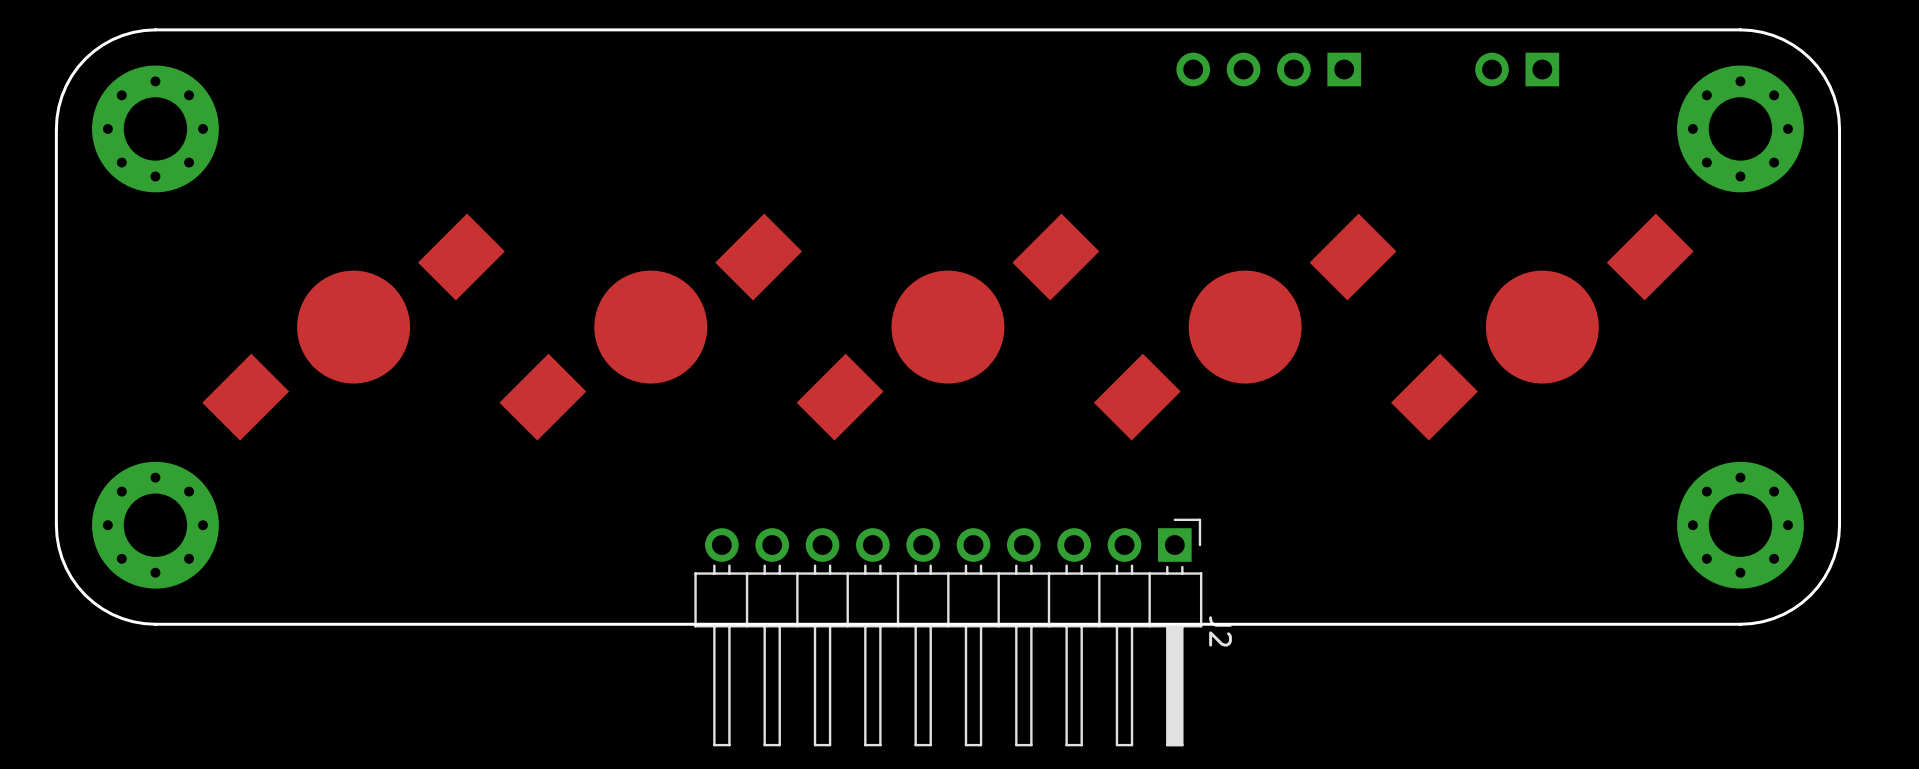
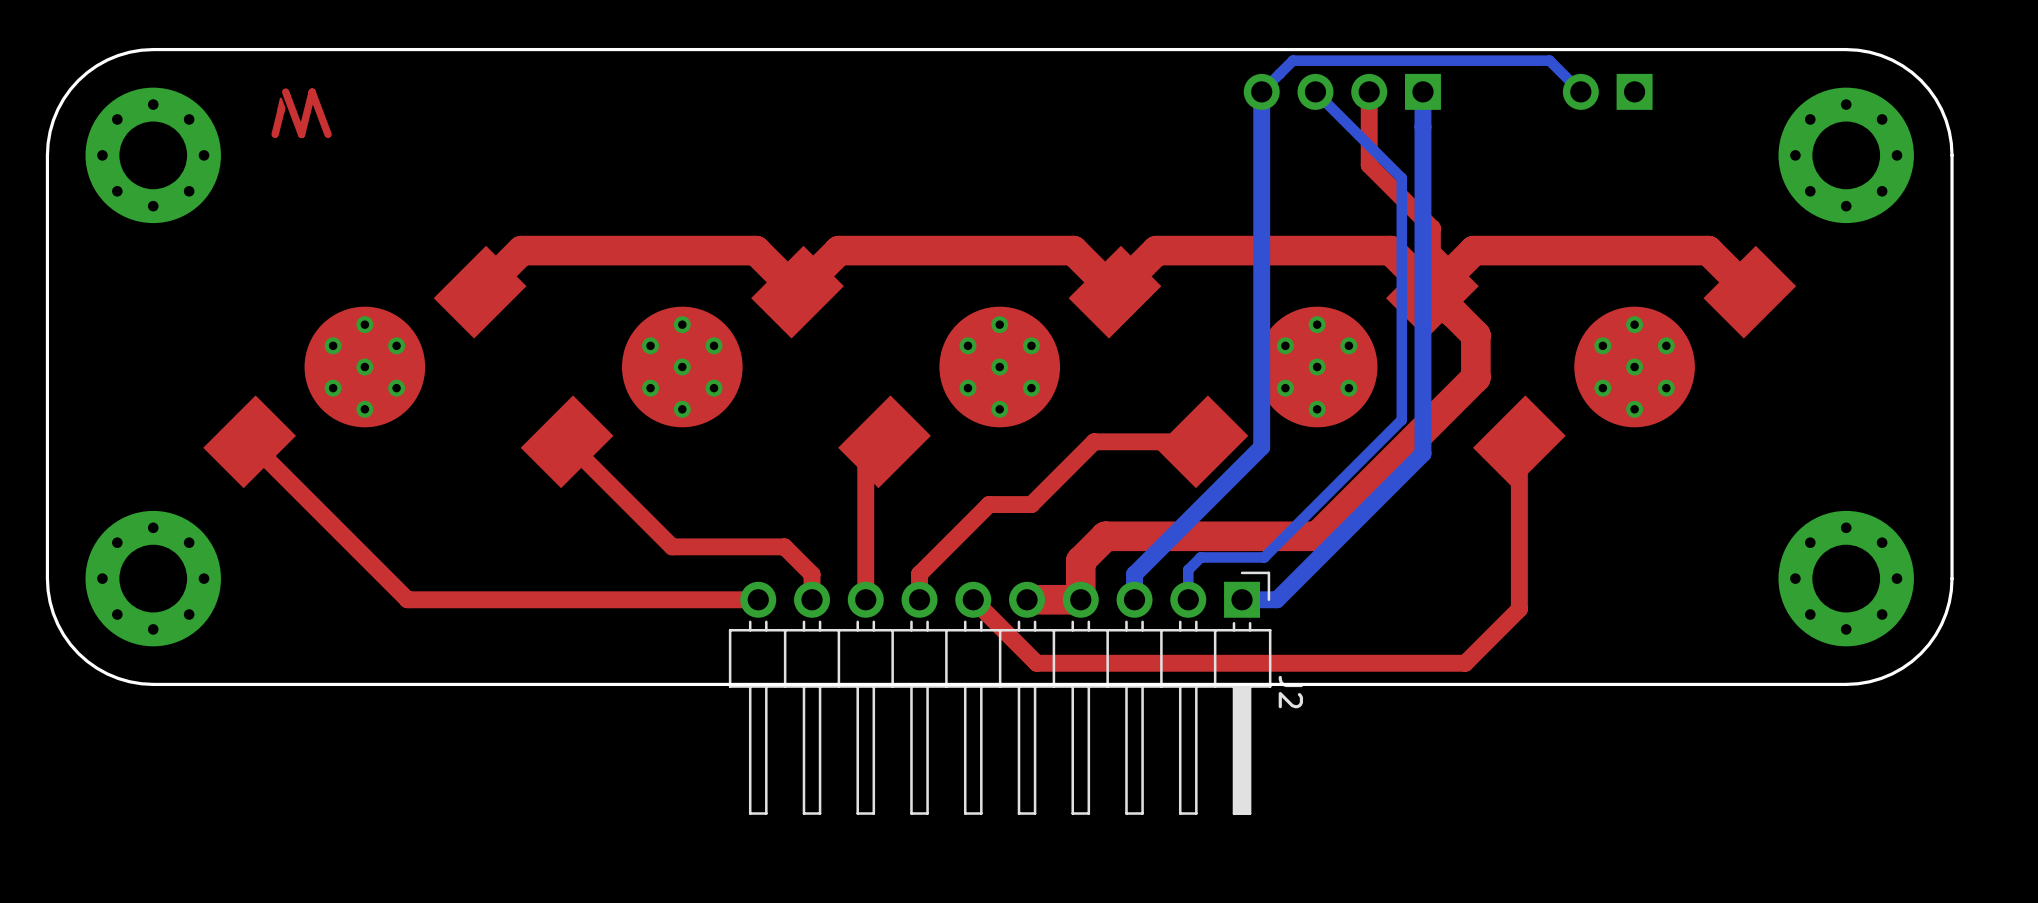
drawing: none -> [271, 88, 332, 139]
bottom track: none -> (1315, 91) (1401, 178) (1401, 419) (1264, 557) (1200, 557) (1188, 569) (1188, 599)
top track: none -> (1369, 91) (1369, 165) (1432, 228) (1432, 292) (1473, 250) (1708, 250) (1749, 292)
bottom track: none -> (1422, 91) (1422, 453) (1276, 599) (1242, 599)
bottom track: none -> (1580, 91) (1549, 60) (1292, 60) (1261, 91) (1261, 447) (1134, 574) (1134, 599)
top track: none -> (480, 292) (521, 250) (755, 250) (797, 292) (839, 250) (1073, 250) (1114, 292) (1156, 250) (1390, 250) (1452, 312)
top track: none -> (1453, 312) (1475, 335) (1475, 377) (1317, 536) (1105, 536) (1080, 561) (1080, 599) (1027, 599)
via: none -> (364, 324)
via: none -> (682, 324)
via: none -> (999, 324)
via: none -> (1317, 324)
via: none -> (1634, 324)
via: none -> (333, 345)
via: none -> (396, 345)
via: none -> (650, 345)
via: none -> (714, 345)
via: none -> (967, 345)
via: none -> (1031, 345)
via: none -> (1285, 345)
via: none -> (1348, 345)
via: none -> (1602, 345)
via: none -> (1666, 345)
via: none -> (364, 366)
via: none -> (682, 366)
via: none -> (999, 366)
via: none -> (1317, 366)
via: none -> (1634, 366)
via: none -> (333, 388)
via: none -> (396, 388)
via: none -> (650, 388)
via: none -> (714, 388)
via: none -> (967, 388)
via: none -> (1031, 388)
via: none -> (1285, 388)
via: none -> (1348, 388)
via: none -> (1602, 388)
via: none -> (1666, 388)
via: none -> (364, 409)
via: none -> (682, 409)
via: none -> (999, 409)
via: none -> (1317, 409)
via: none -> (1634, 409)
top track: none -> (249, 441) (407, 599) (758, 599)
top track: none -> (567, 441) (672, 546) (784, 546) (812, 574) (812, 599)
top track: none -> (884, 441) (865, 460) (865, 599)
top track: none -> (1201, 441) (1094, 441) (1031, 504) (989, 504) (919, 574) (919, 599)
top track: none -> (1519, 441) (1519, 609) (1465, 663) (1036, 663) (973, 599)

